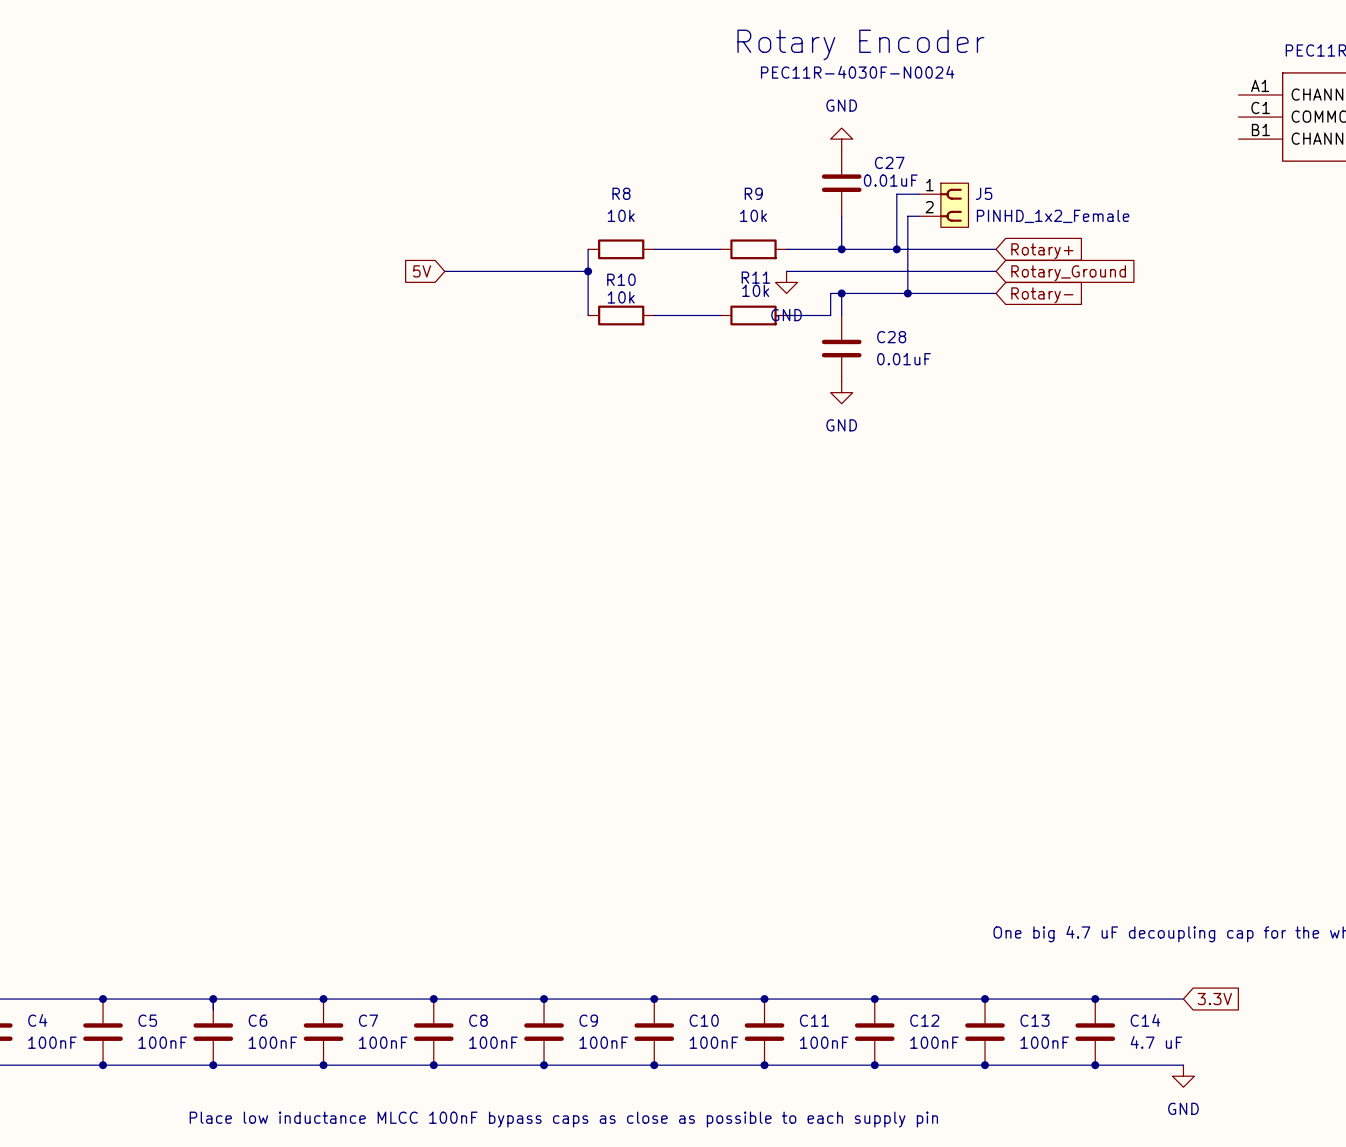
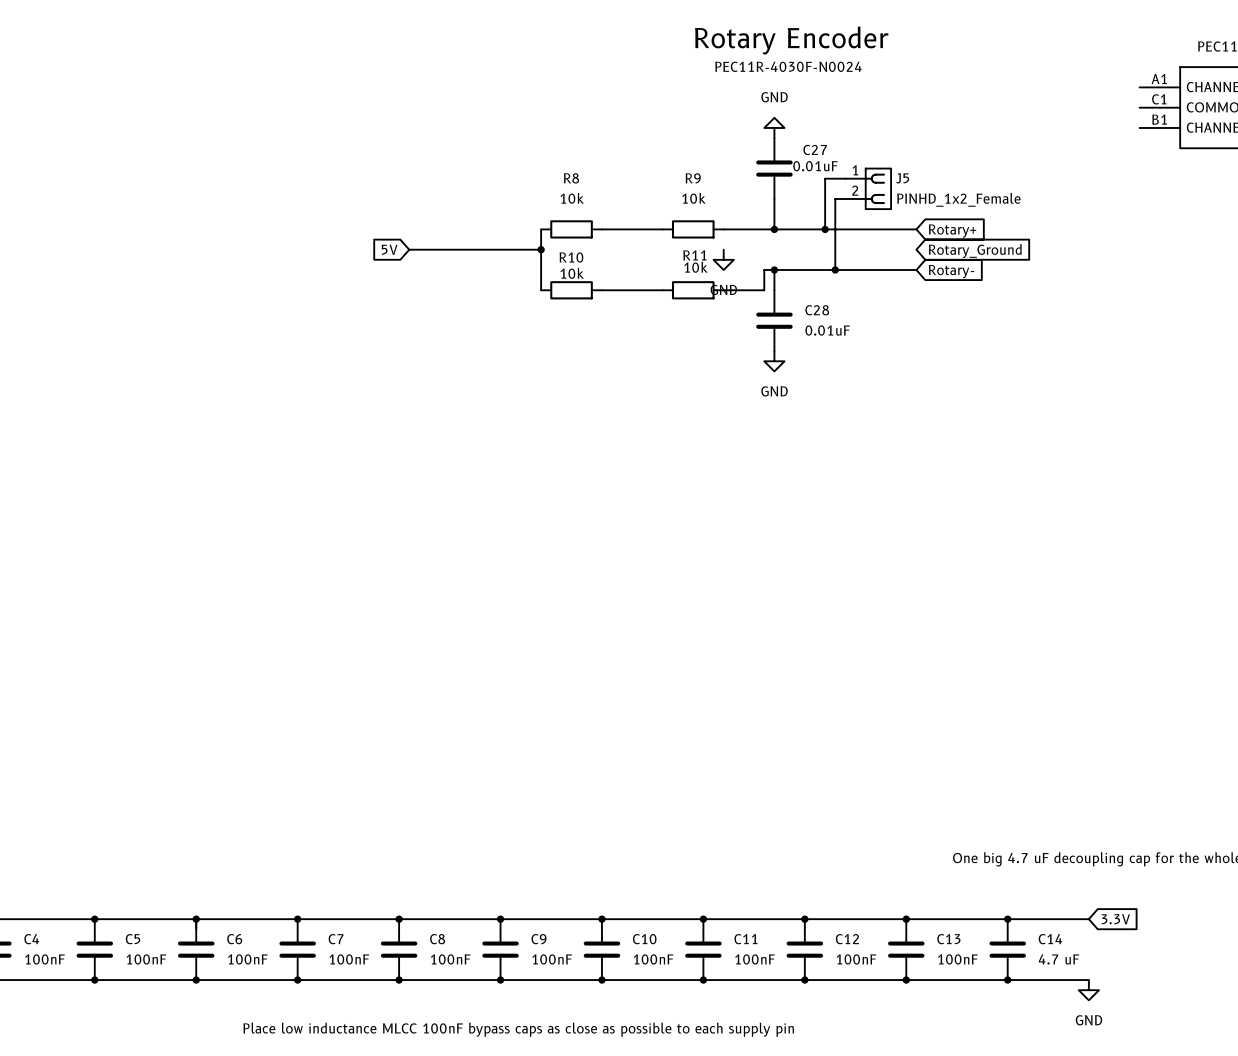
wire: (786, 271) (996, 271) -> none

